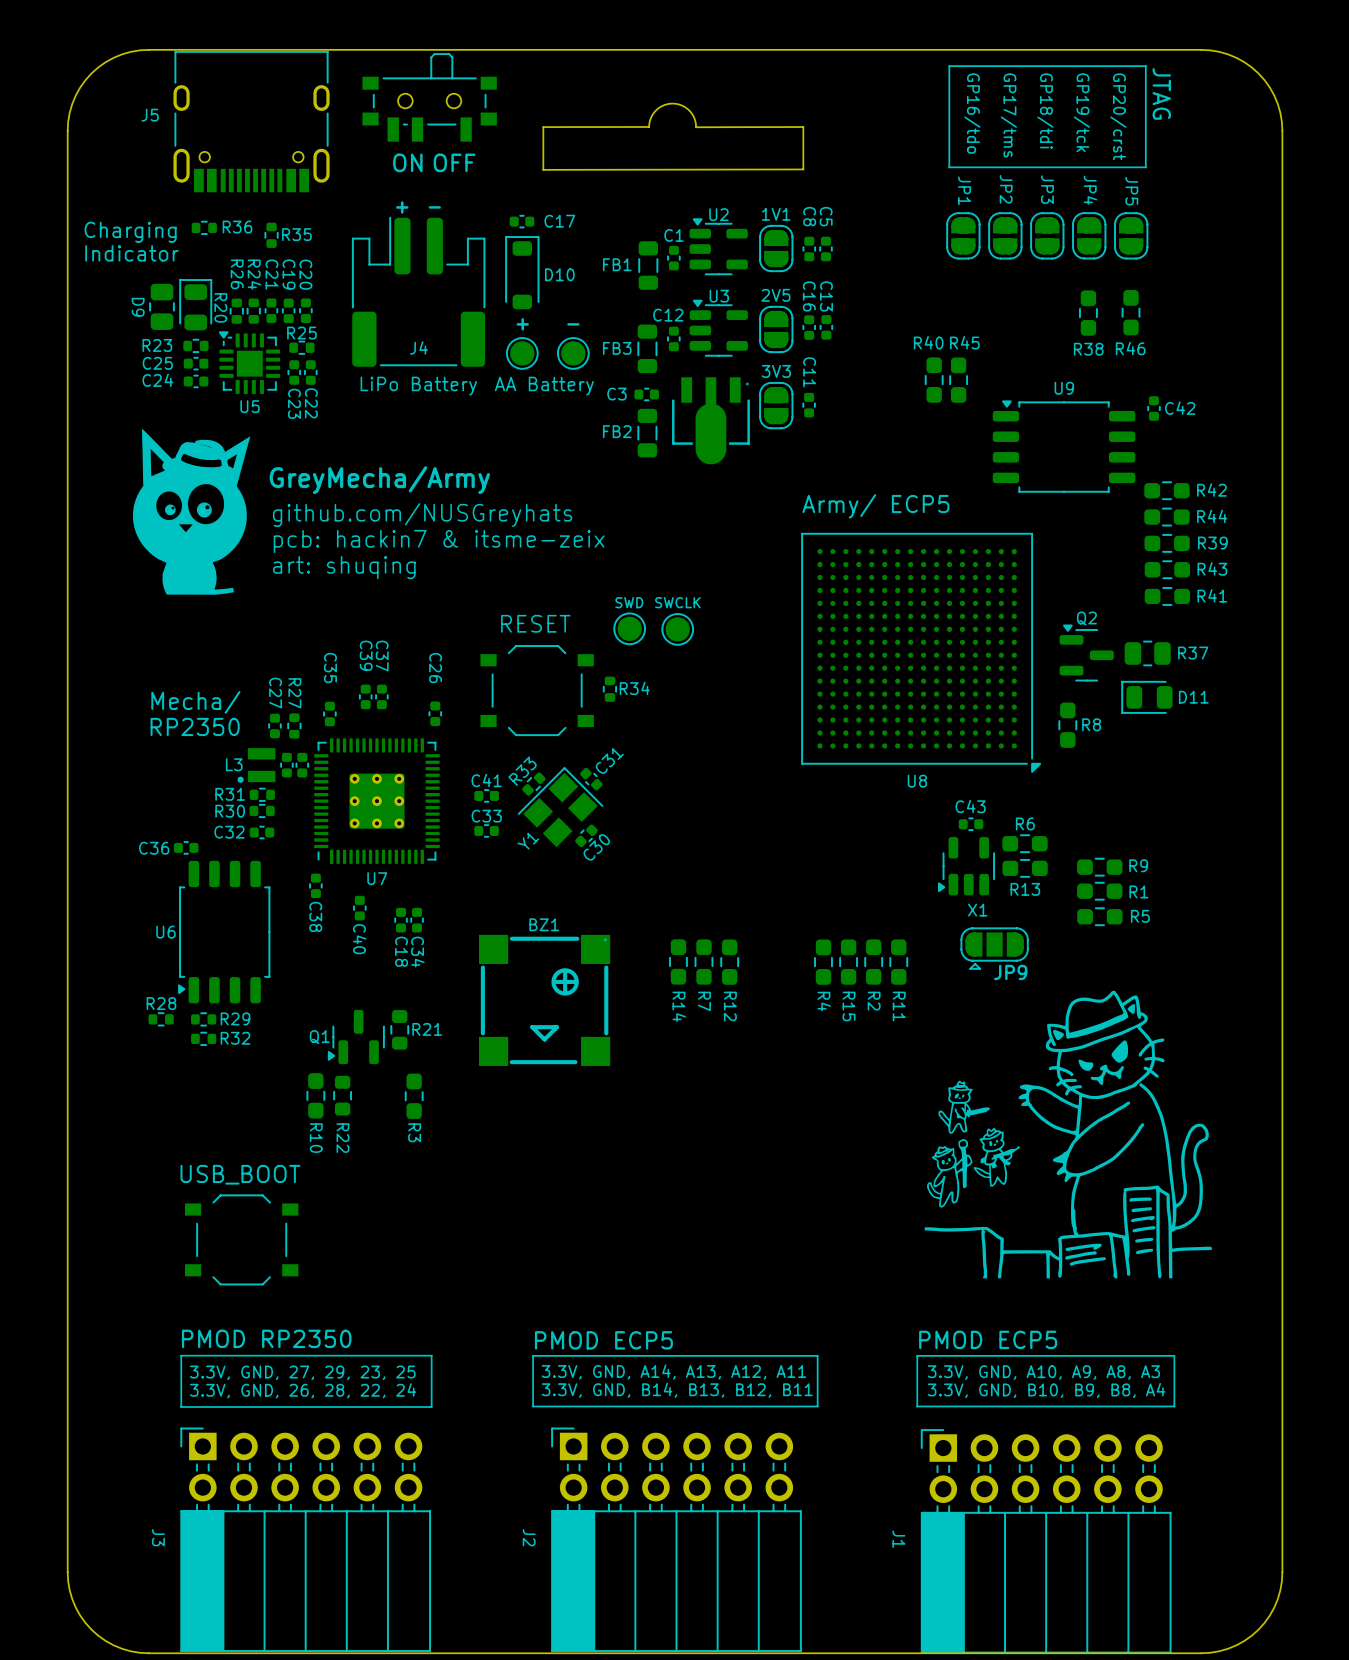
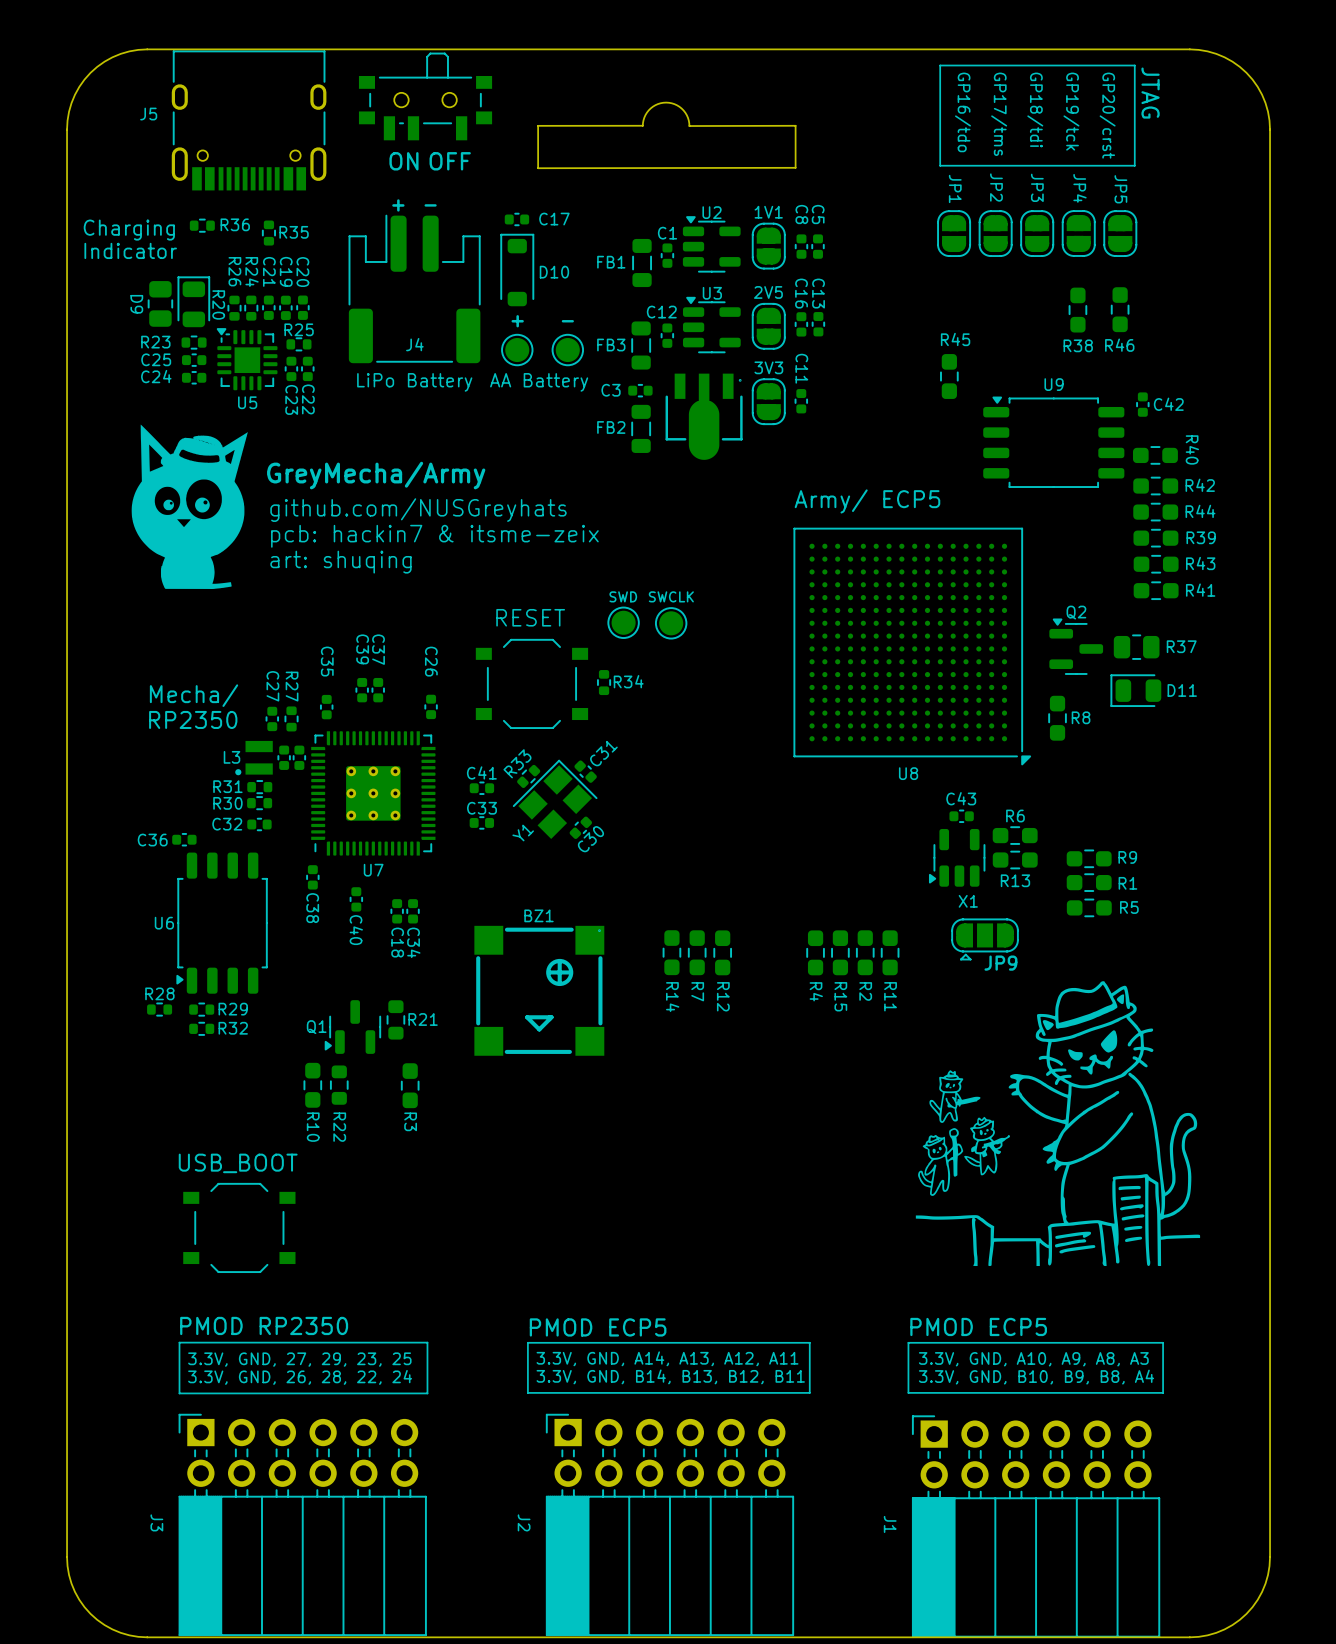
R40 rotation: 0° (934, 380) -> 90° clockwise (1155, 455)
R40 position: (934, 380) -> (1155, 455)

